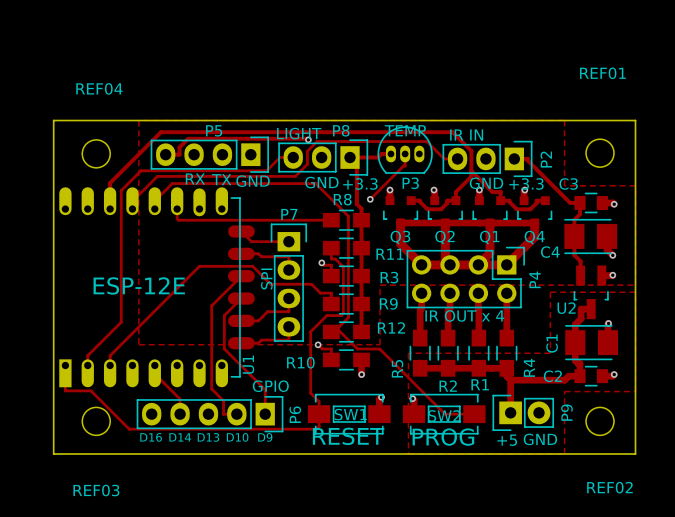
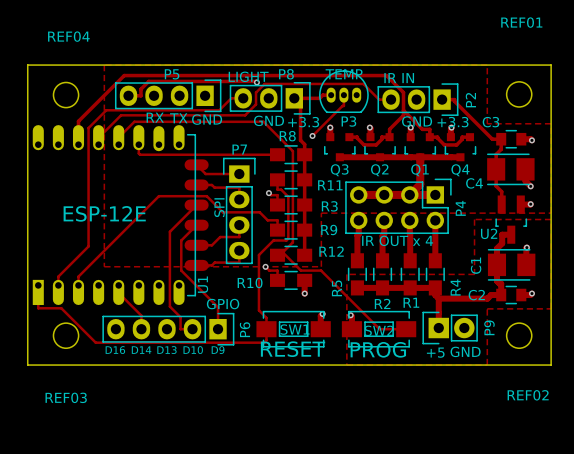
track: (400, 222) (400, 243) (421, 264) -> none
track: (445, 222) (445, 260) (450, 264) -> none
track: (534, 223) (534, 236) (506, 264) -> none

